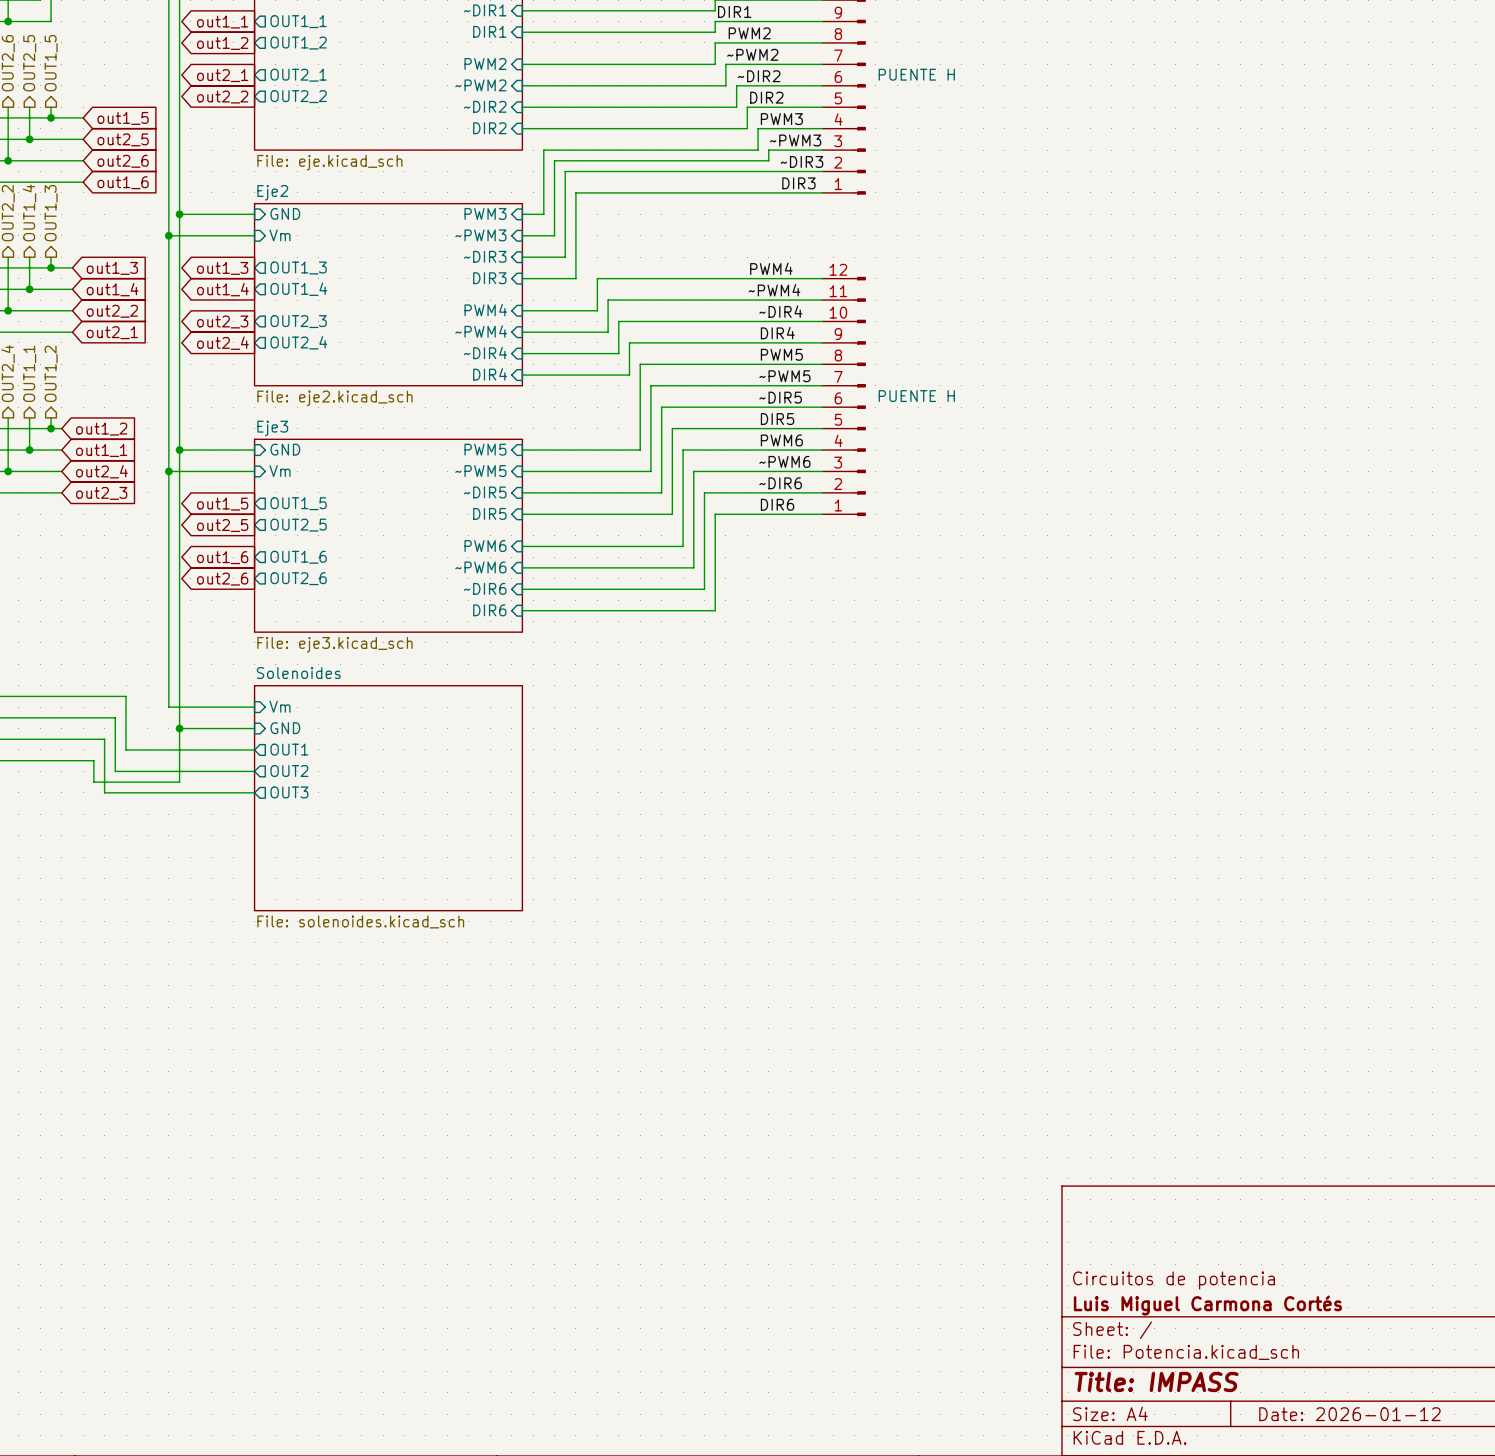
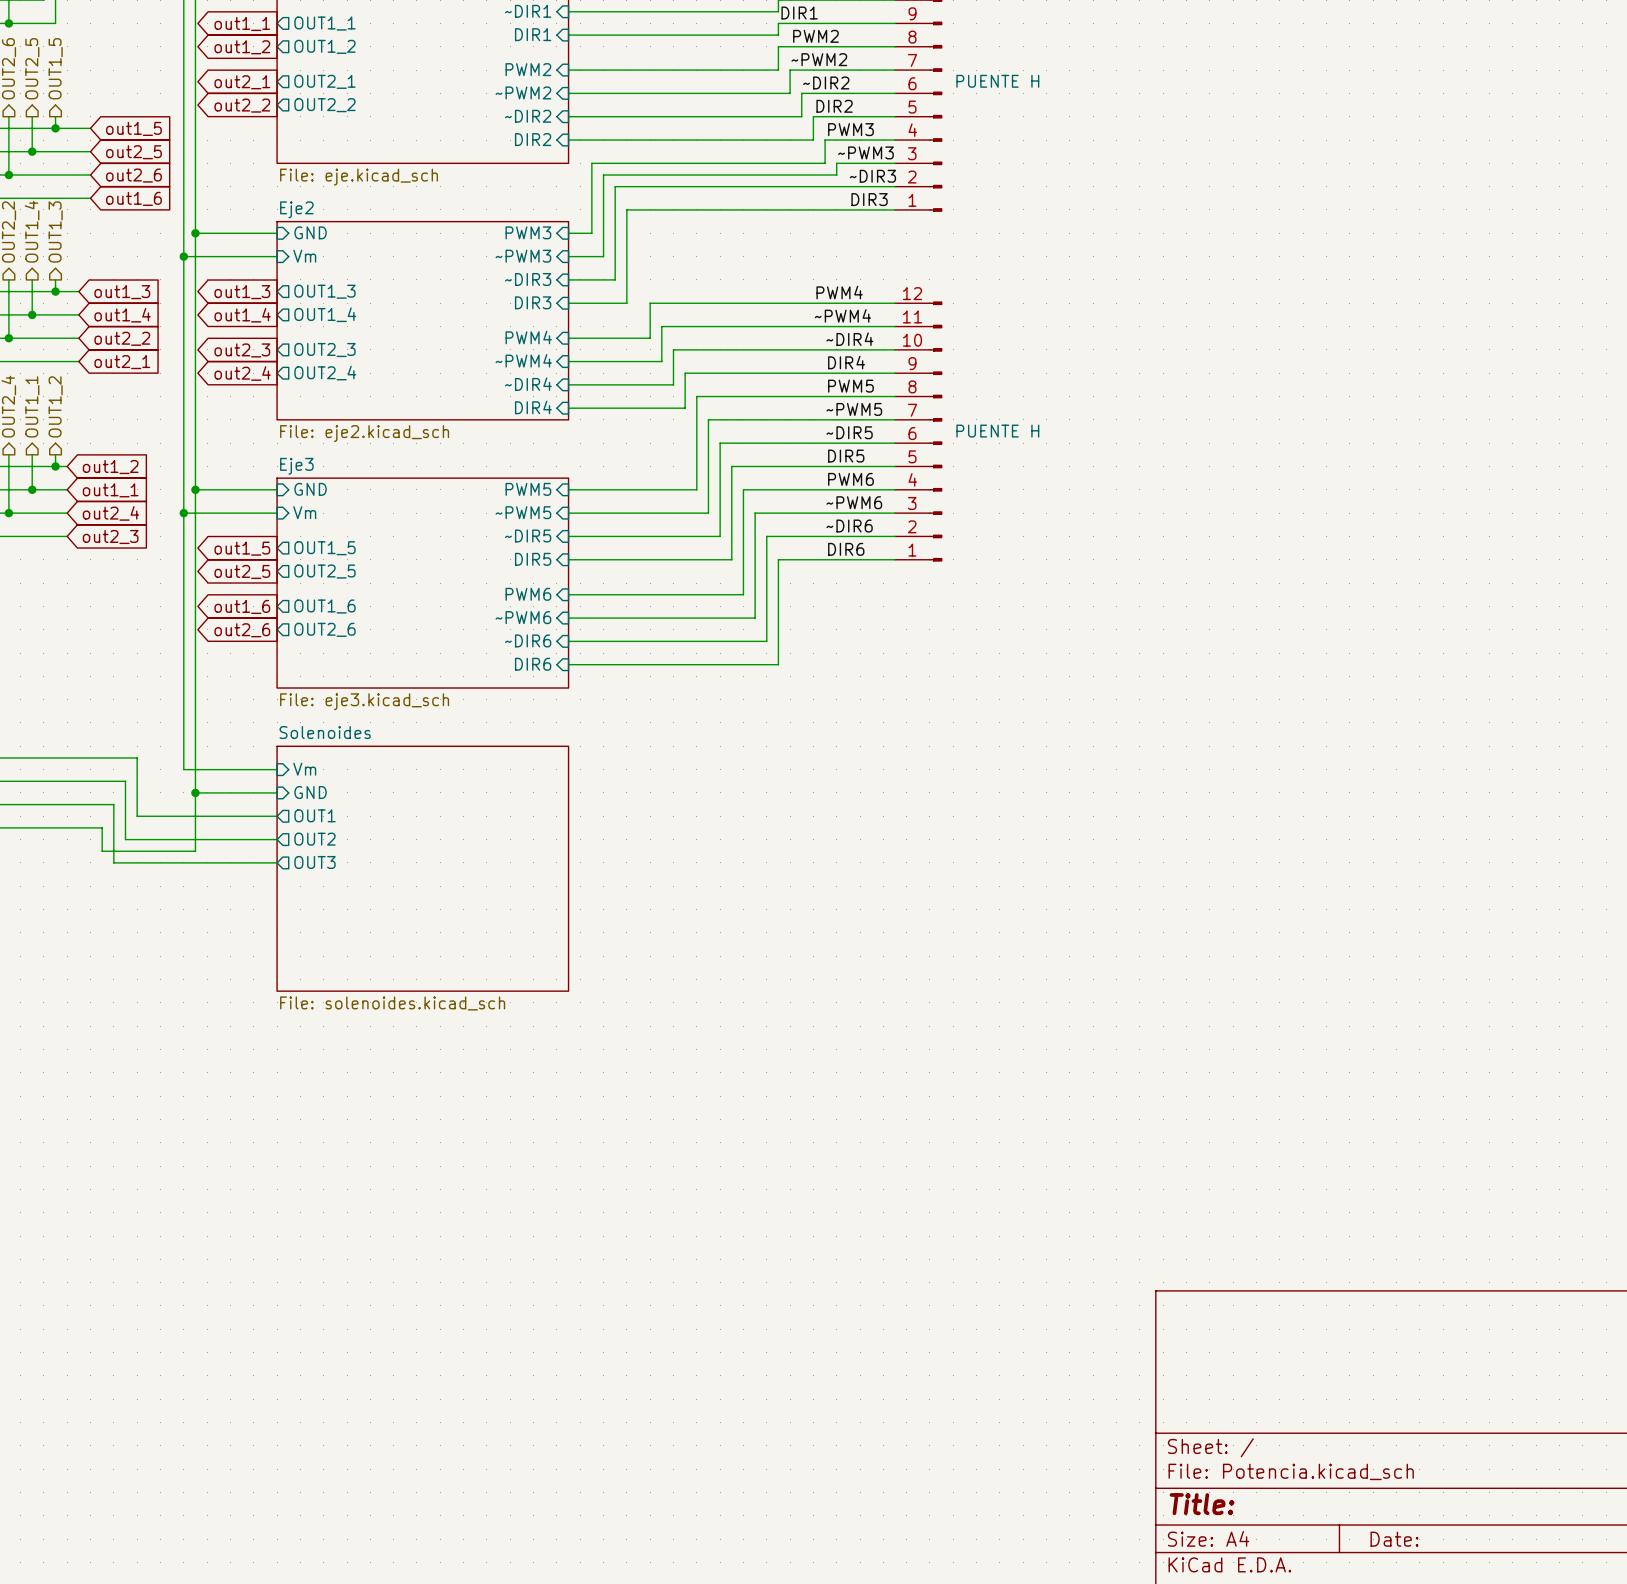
title block: Circuitos de potencia (1173, 1280) -> none
title block: Luis Miguel Carmona Cortés (1207, 1305) -> none
title block: Title: IMPASS (1156, 1381) -> Title: (1202, 1504)
title block: Date: 2026-01-12 (1349, 1414) -> Date: (1394, 1539)

